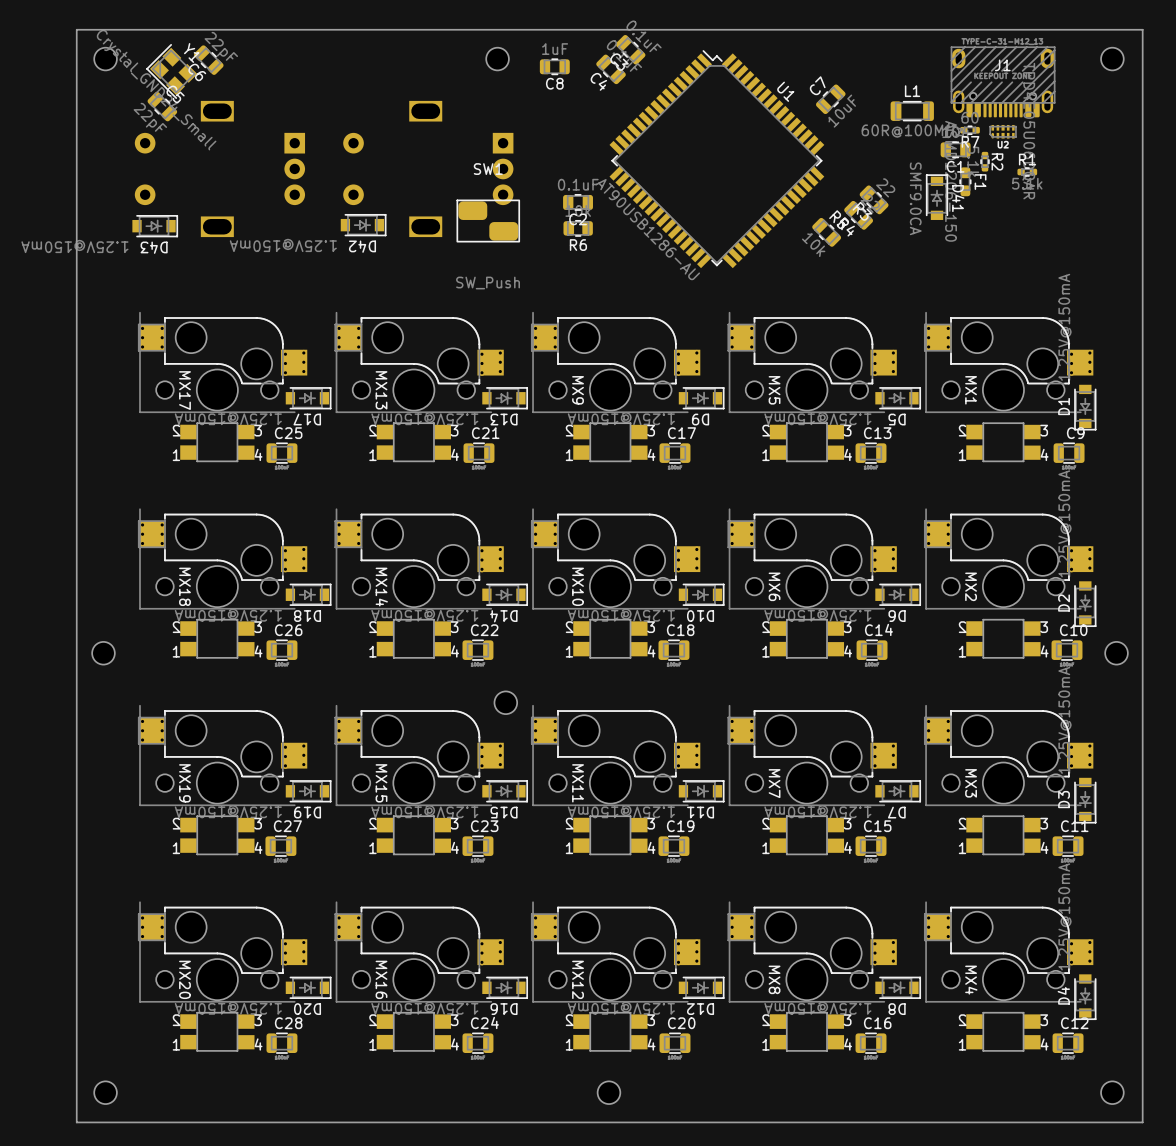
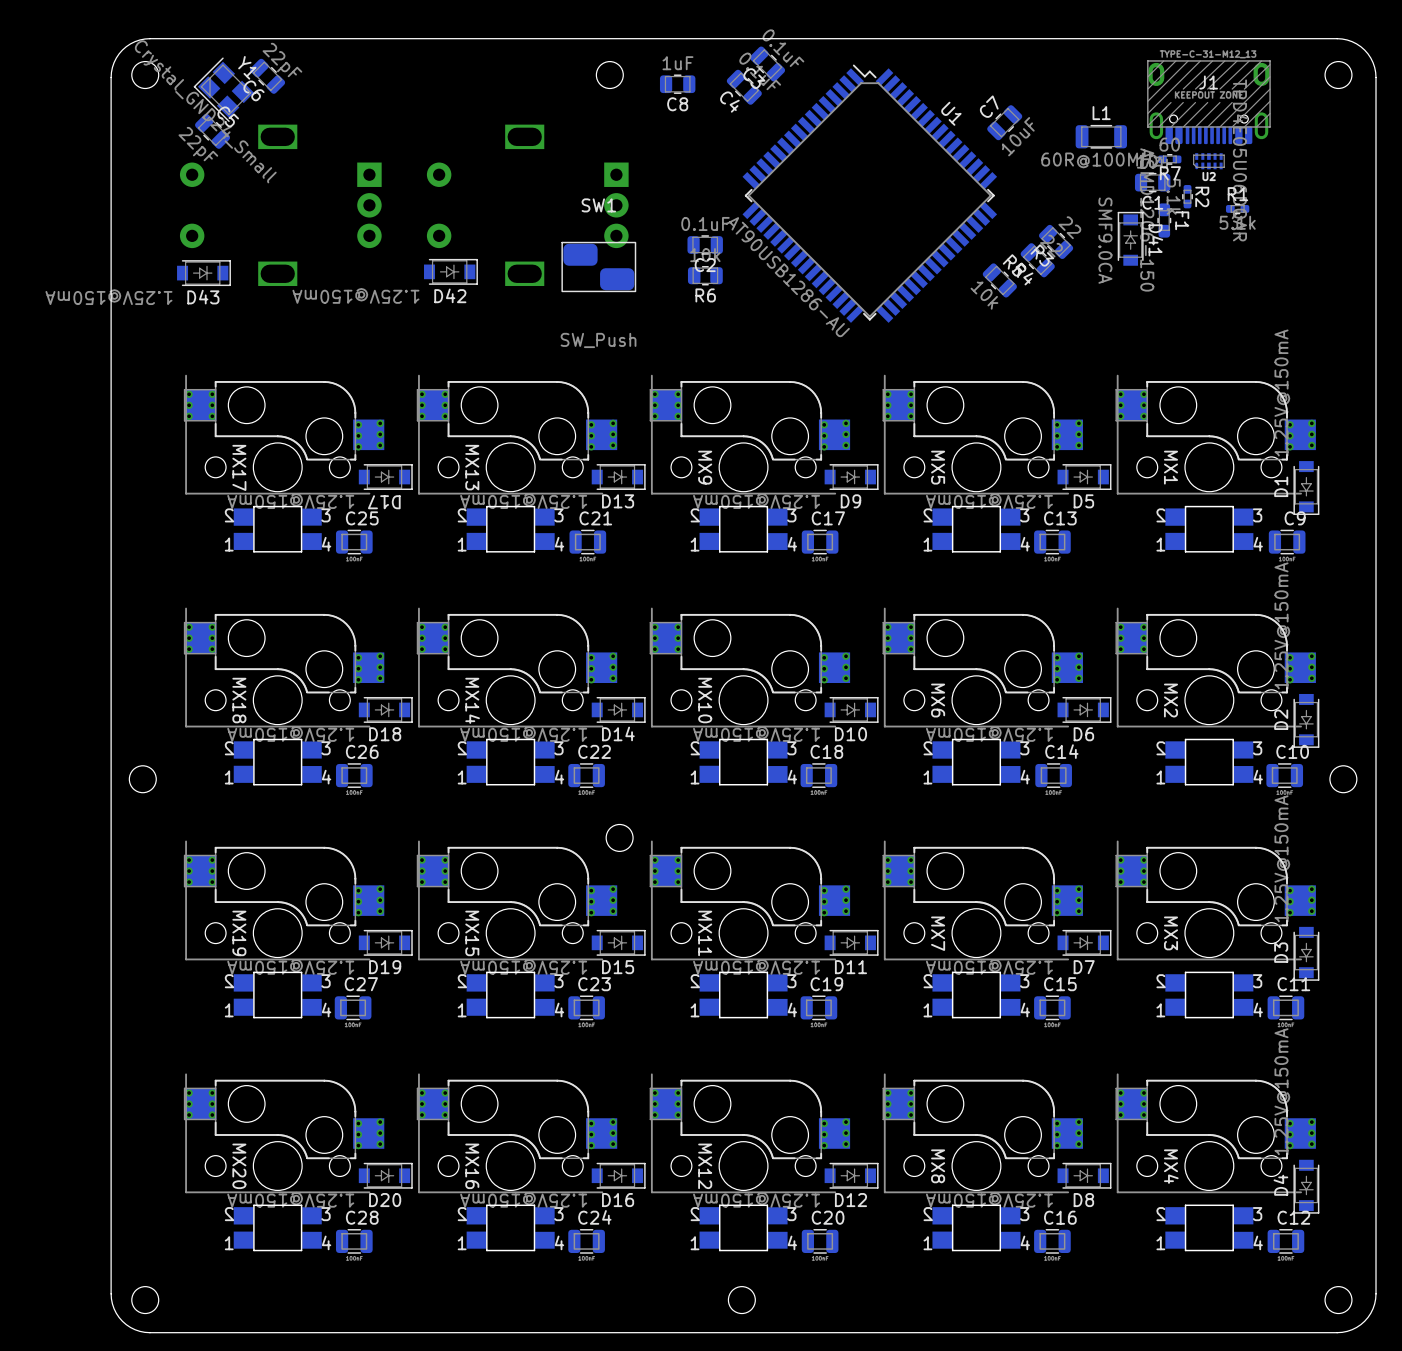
board edge: (76, 61) (76, 29) (1142, 29) (1142, 1122) (76, 1122) (76, 1087) -> (111, 77) (114, 62) (122, 50) (135, 41) (149, 38) (1337, 38) (1352, 41) (1364, 50) (1373, 62) (1376, 77) (1376, 1293) (1373, 1308) (1364, 1321) (1352, 1329) (1337, 1332) (149, 1332) (135, 1329) (122, 1321) (114, 1308) (111, 1293)
D42 name rotation: 0° (362, 246) -> 180° (450, 295)
D43 name rotation: 0° (154, 247) -> 180° (203, 297)
D13 name rotation: 0° (504, 419) -> 180° (618, 501)
D9 name rotation: 0° (700, 419) -> 180° (850, 501)
D5 name rotation: 0° (897, 419) -> 180° (1083, 501)
D18 name rotation: 0° (307, 616) -> 180° (385, 734)
D14 name rotation: 0° (503, 616) -> 180° (618, 733)
D10 name rotation: 0° (700, 616) -> 180° (850, 734)
D6 name rotation: 0° (897, 616) -> 180° (1083, 734)
D19 name rotation: 0° (307, 812) -> 180° (385, 967)
D15 name rotation: 0° (504, 812) -> 180° (618, 967)
D11 name rotation: 0° (700, 812) -> 180° (850, 967)
D7 name rotation: 0° (896, 812) -> 180° (1084, 967)
D20 name rotation: 0° (307, 1009) -> 180° (385, 1200)
D16 name rotation: 0° (504, 1009) -> 180° (618, 1200)
D12 name rotation: 0° (700, 1009) -> 180° (850, 1200)
D8 name rotation: 0° (897, 1009) -> 180° (1083, 1200)

